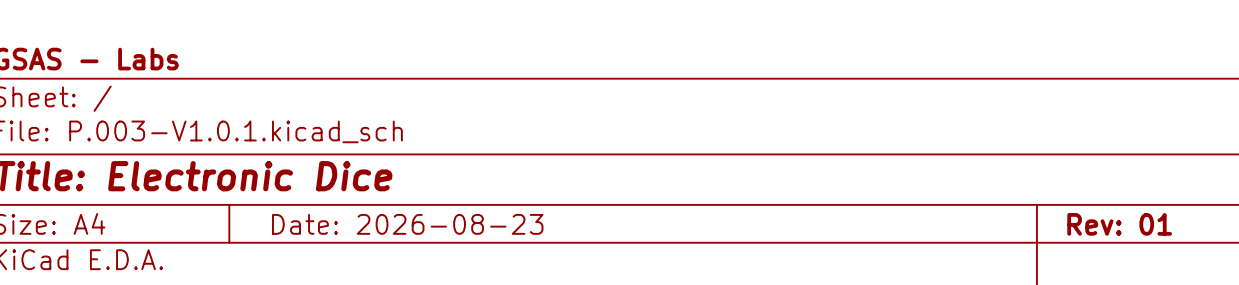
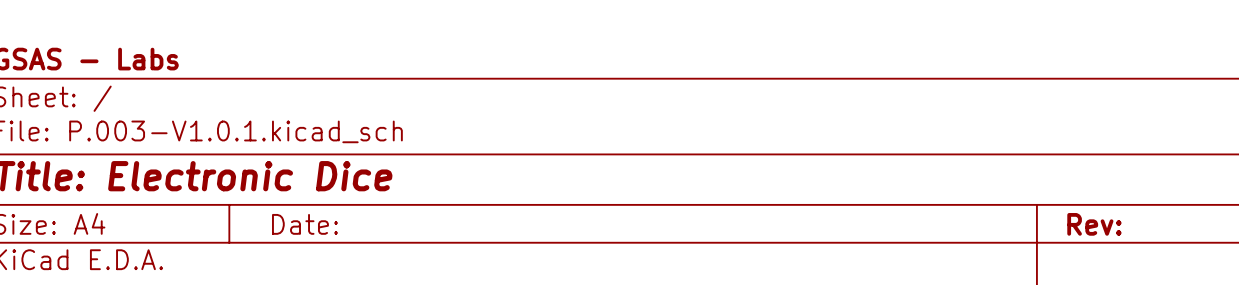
title block: Date: 2026-08-23 (407, 224) -> Date: (304, 224)
title block: Rev: 01 (1119, 224) -> Rev: (1094, 224)

